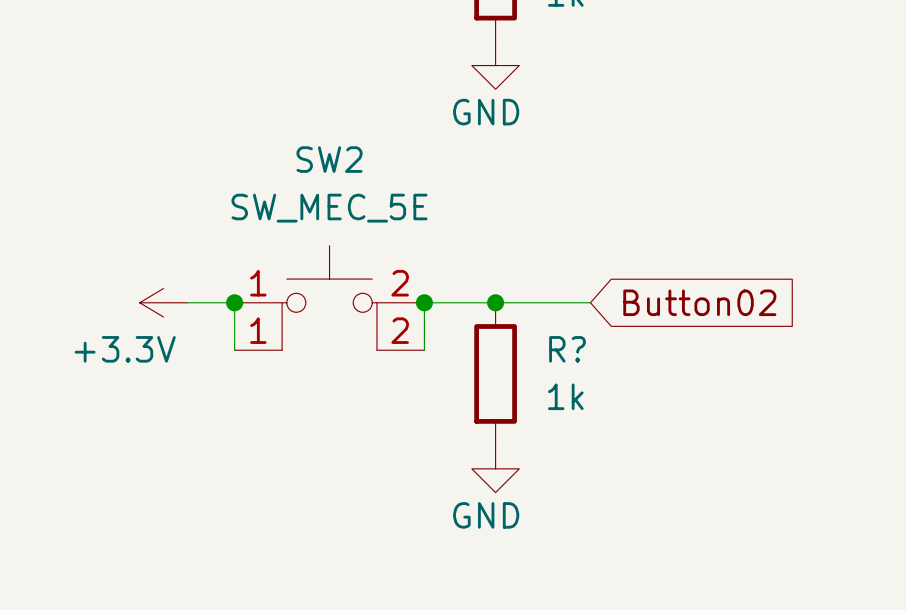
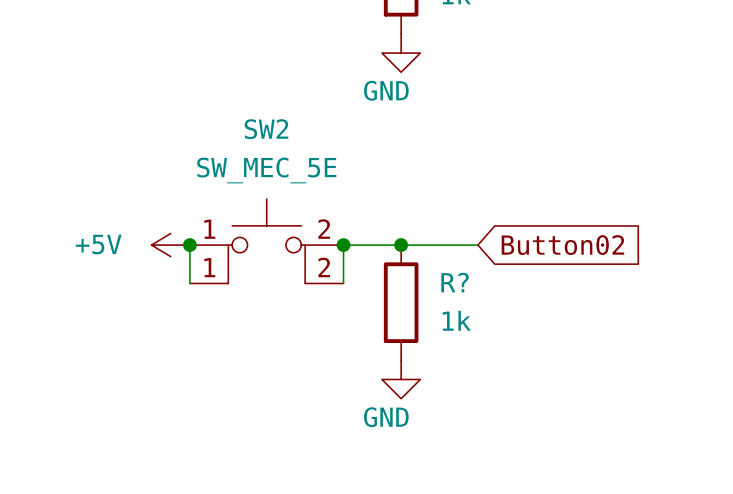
power symbol: +3.3V (163, 302) -> none
power symbol: none -> +5V (170, 245)

